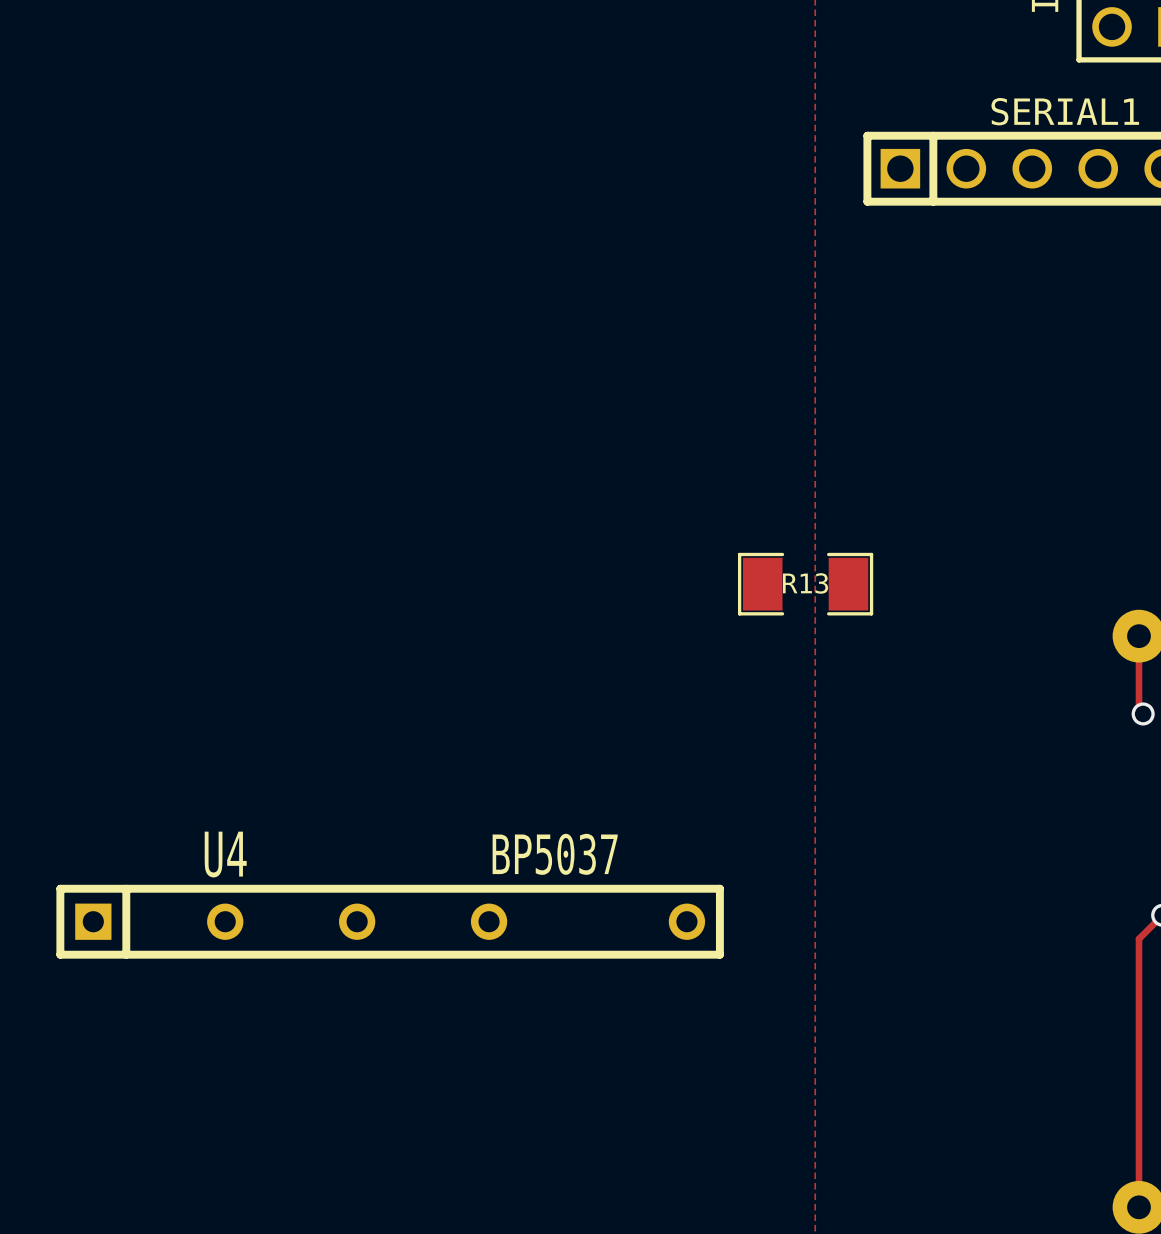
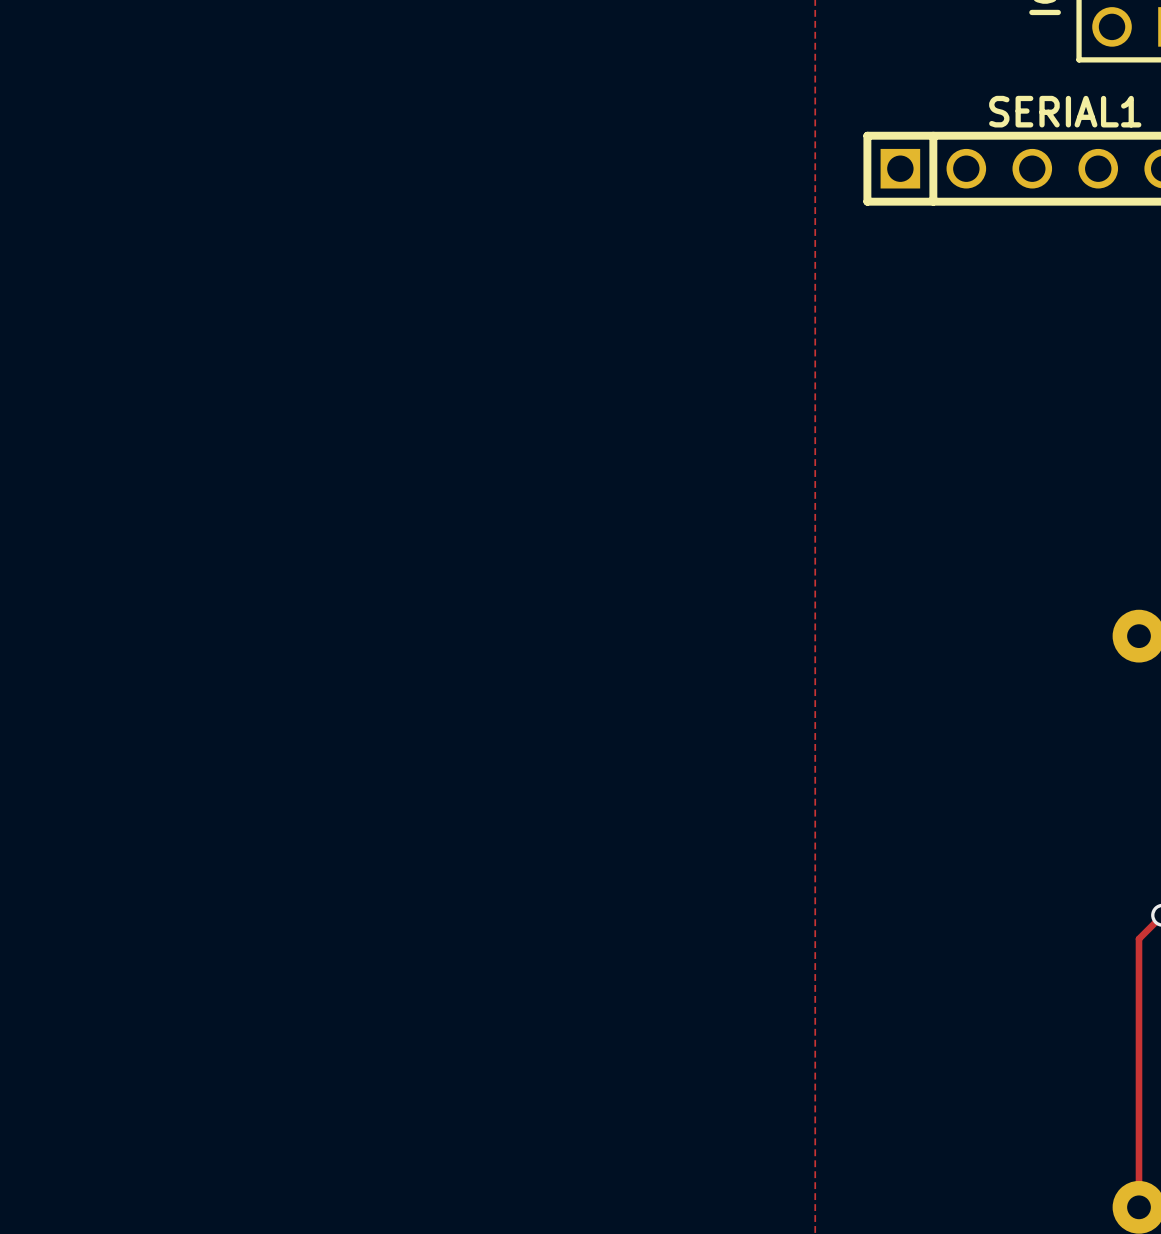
R13: (805, 584) -> none
track: (1139, 636) (1139, 709) (1143, 713) -> none
via: (1143, 713) -> none
U4: BP5037 (390, 921) -> none

